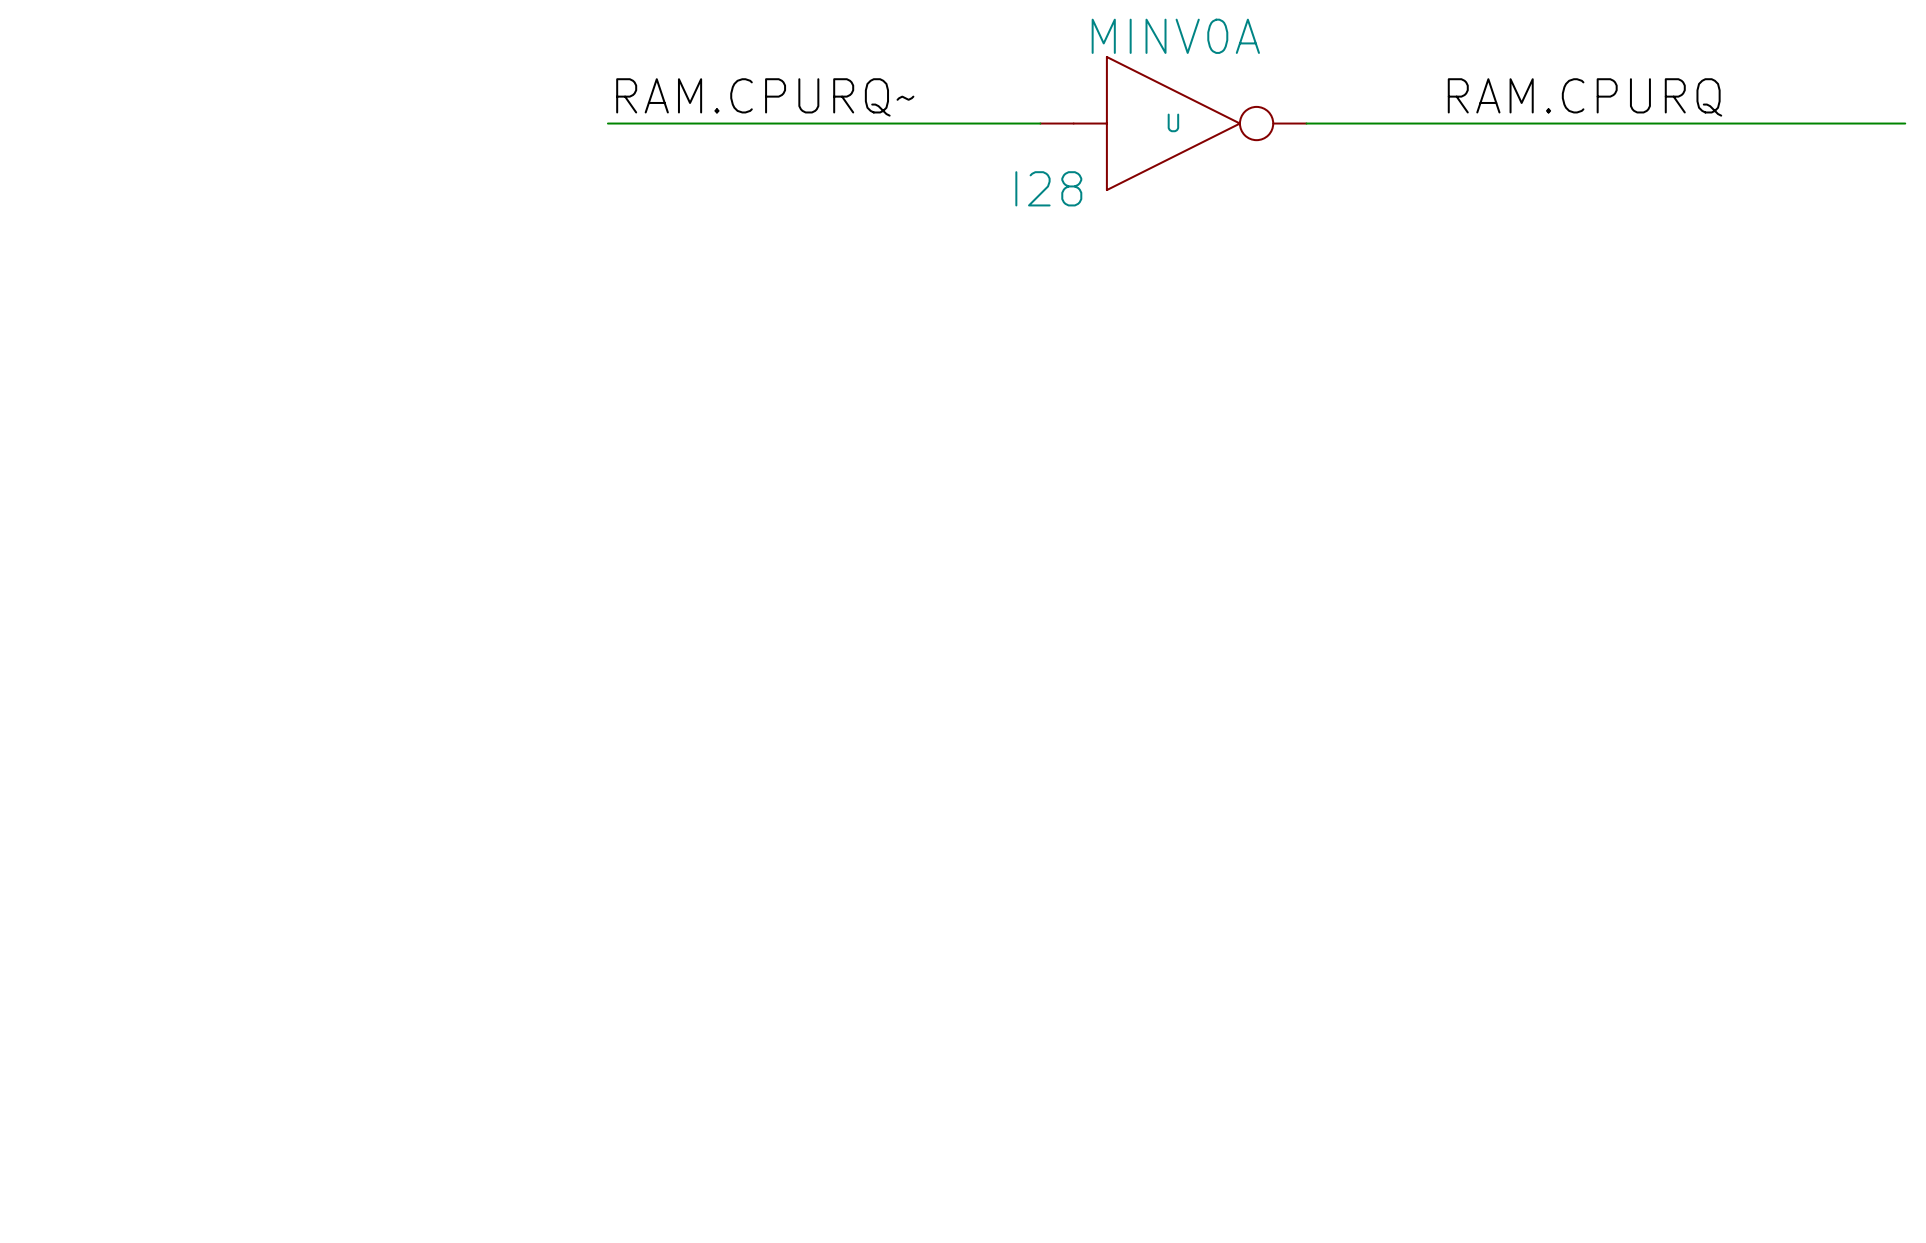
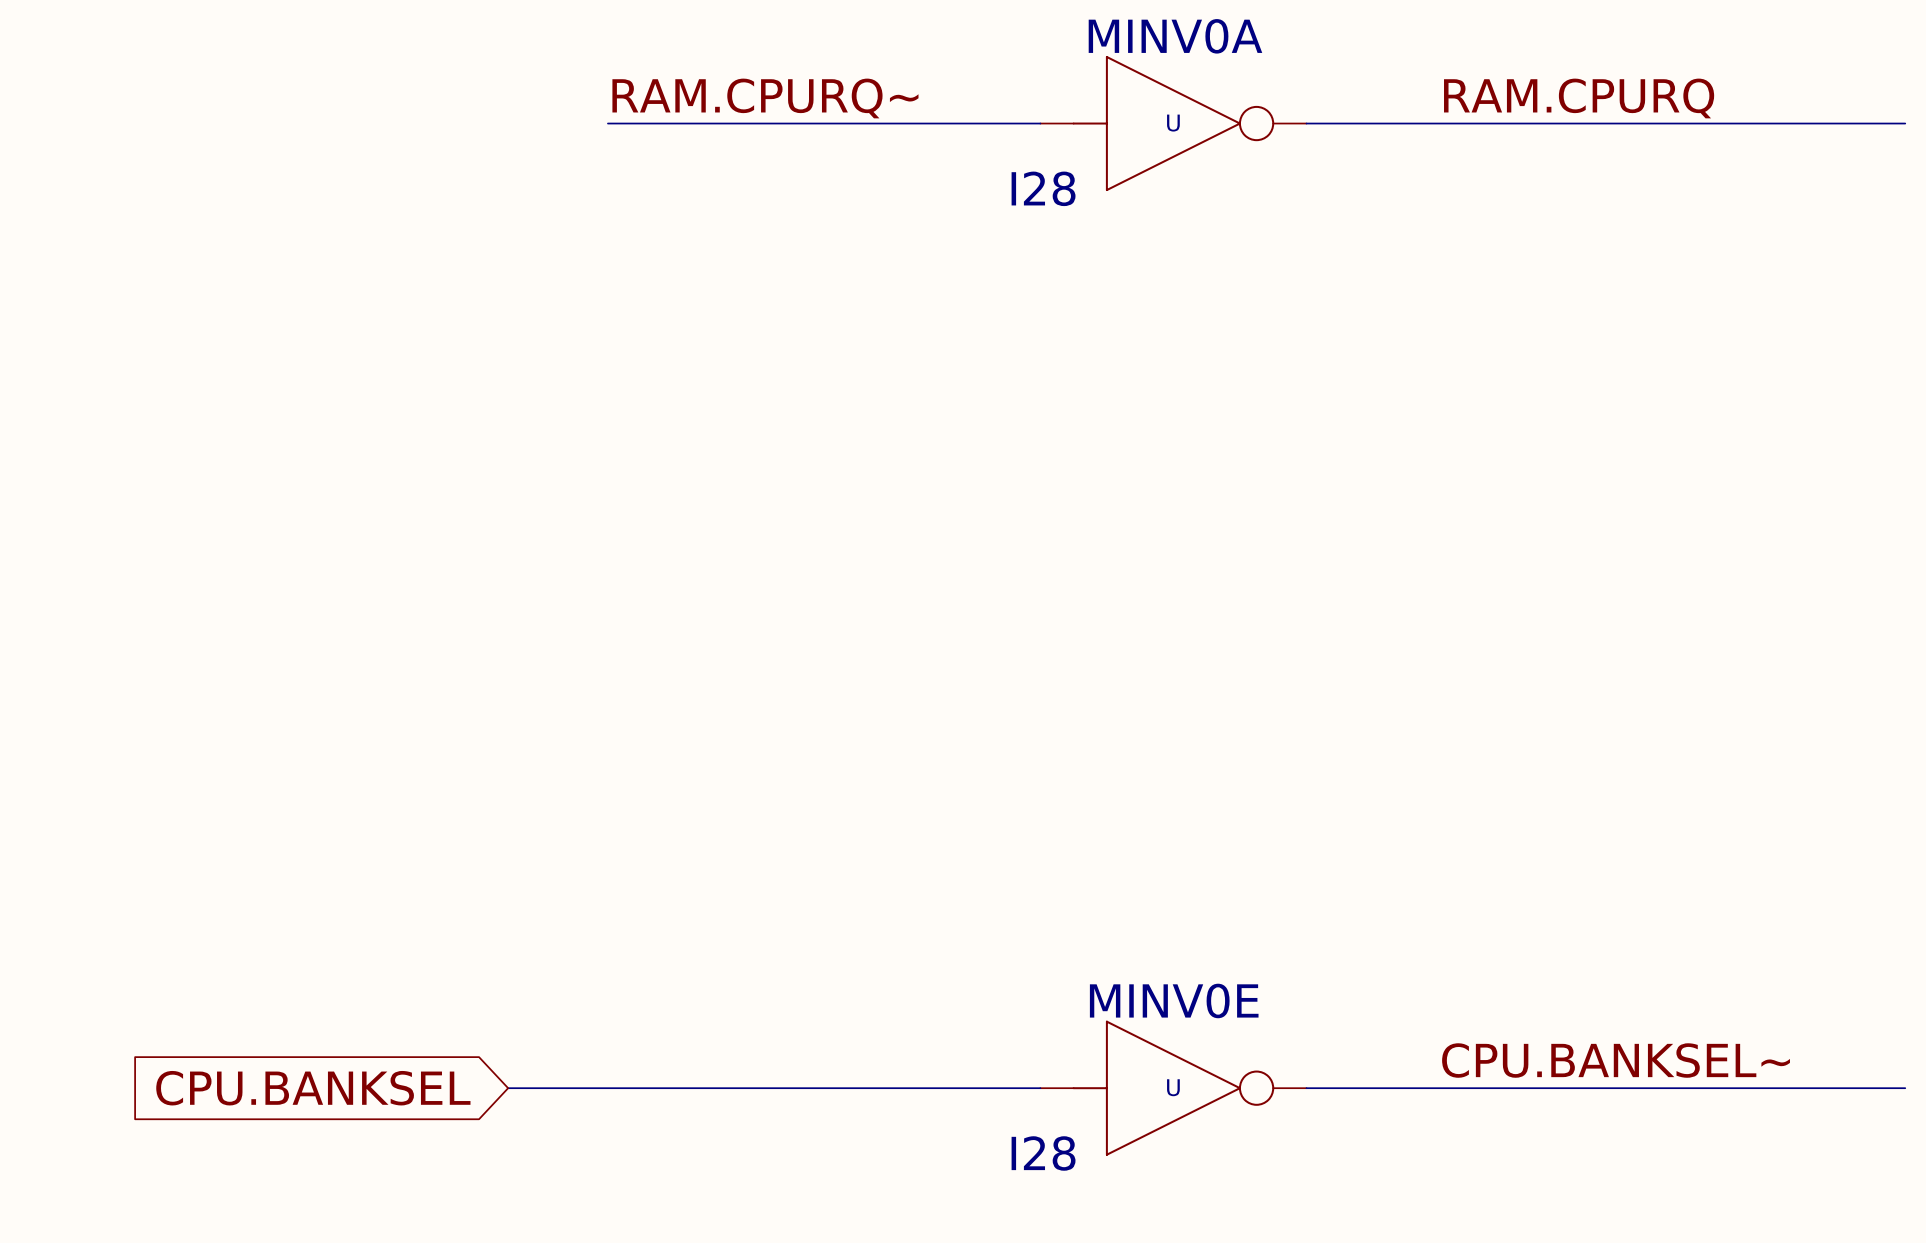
label: none -> CPU.BANKSEL~ (1616, 1060)
global label: none -> CPU.BANKSEL (313, 1088)
wire: none -> (508, 1088) (1040, 1088)
U: none -> (1173, 1088)
wire: none -> (1306, 1088) (1905, 1088)

